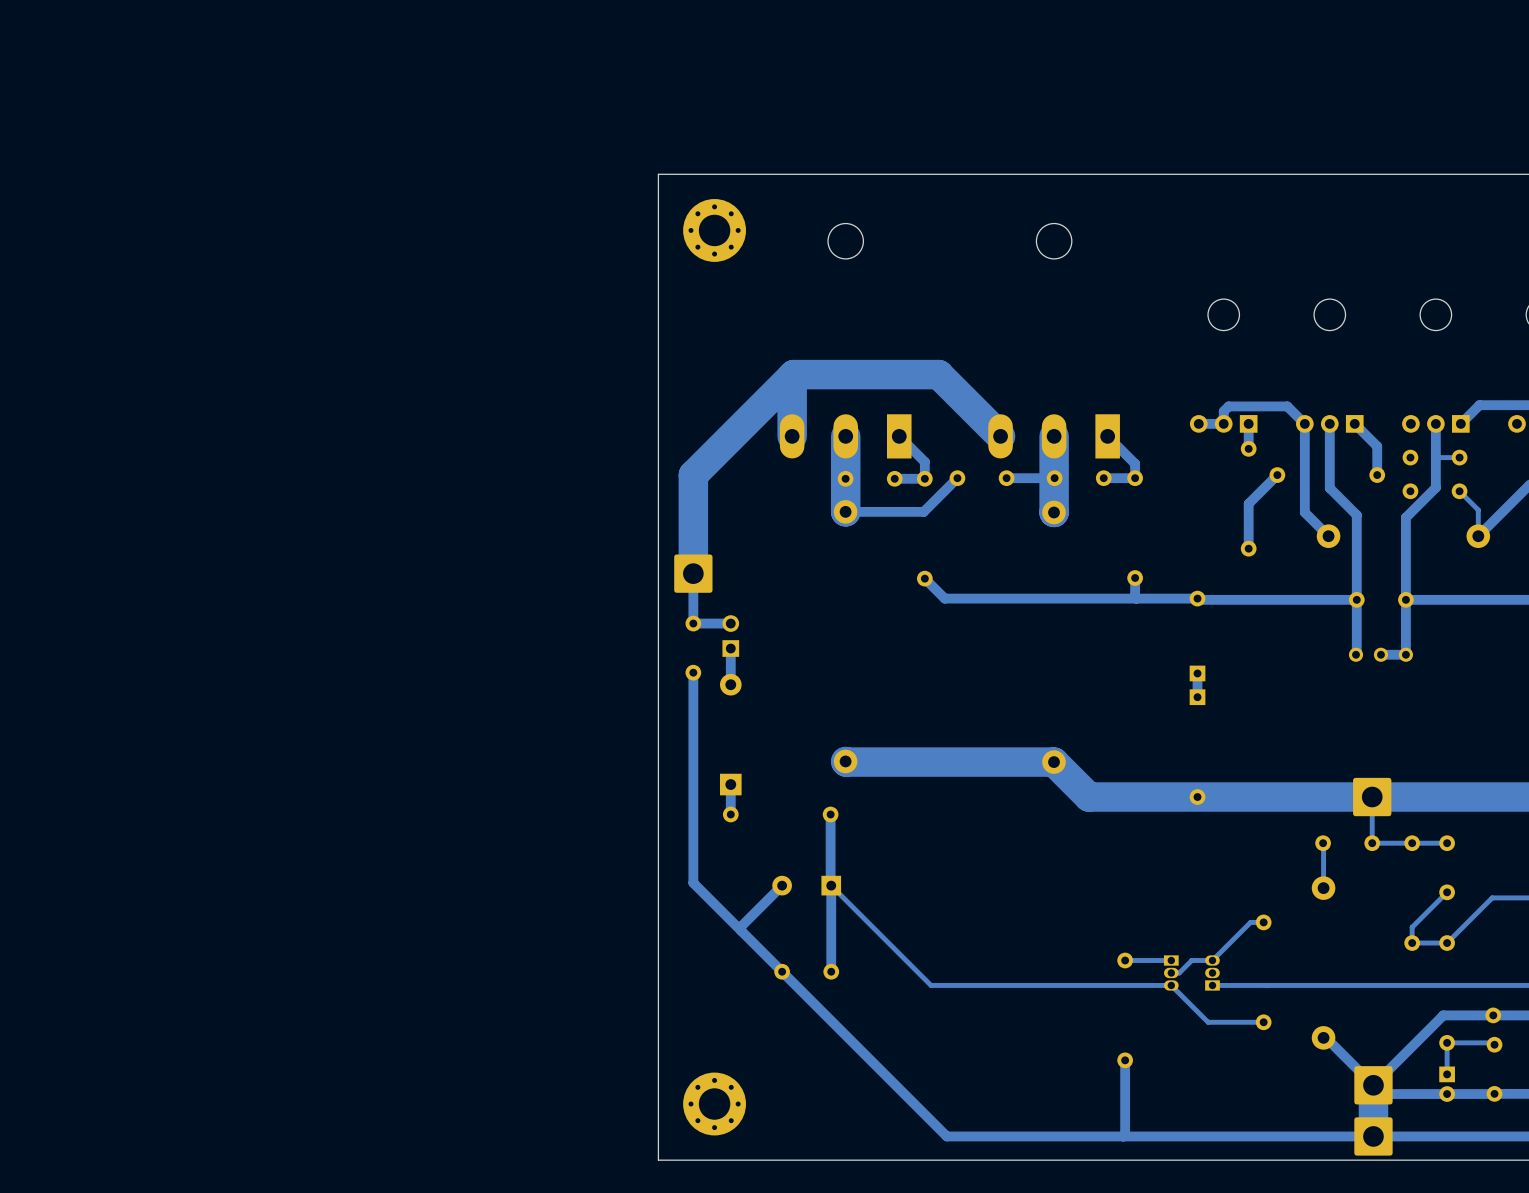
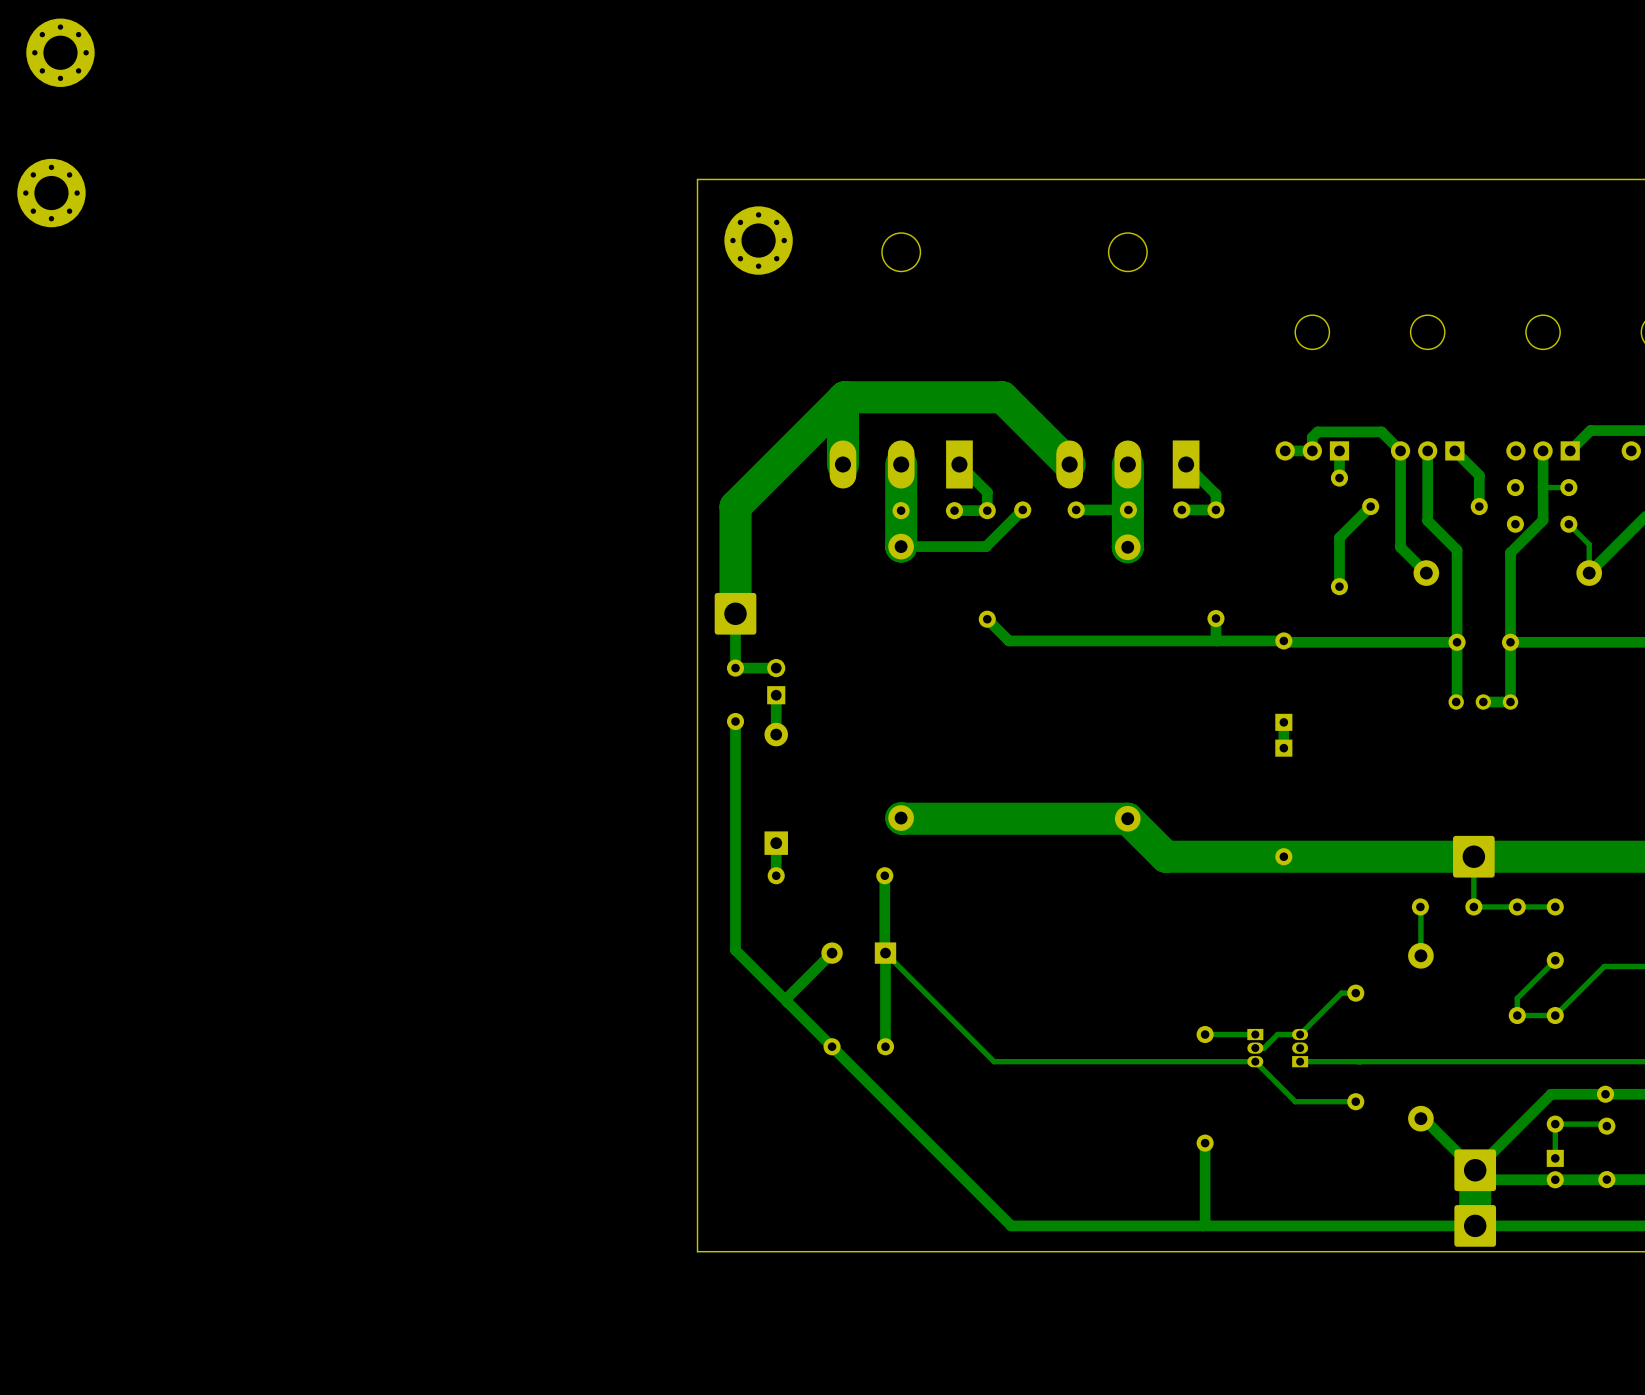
part: none -> (60, 52)
part: none -> (51, 193)
part: (714, 1104) -> none

